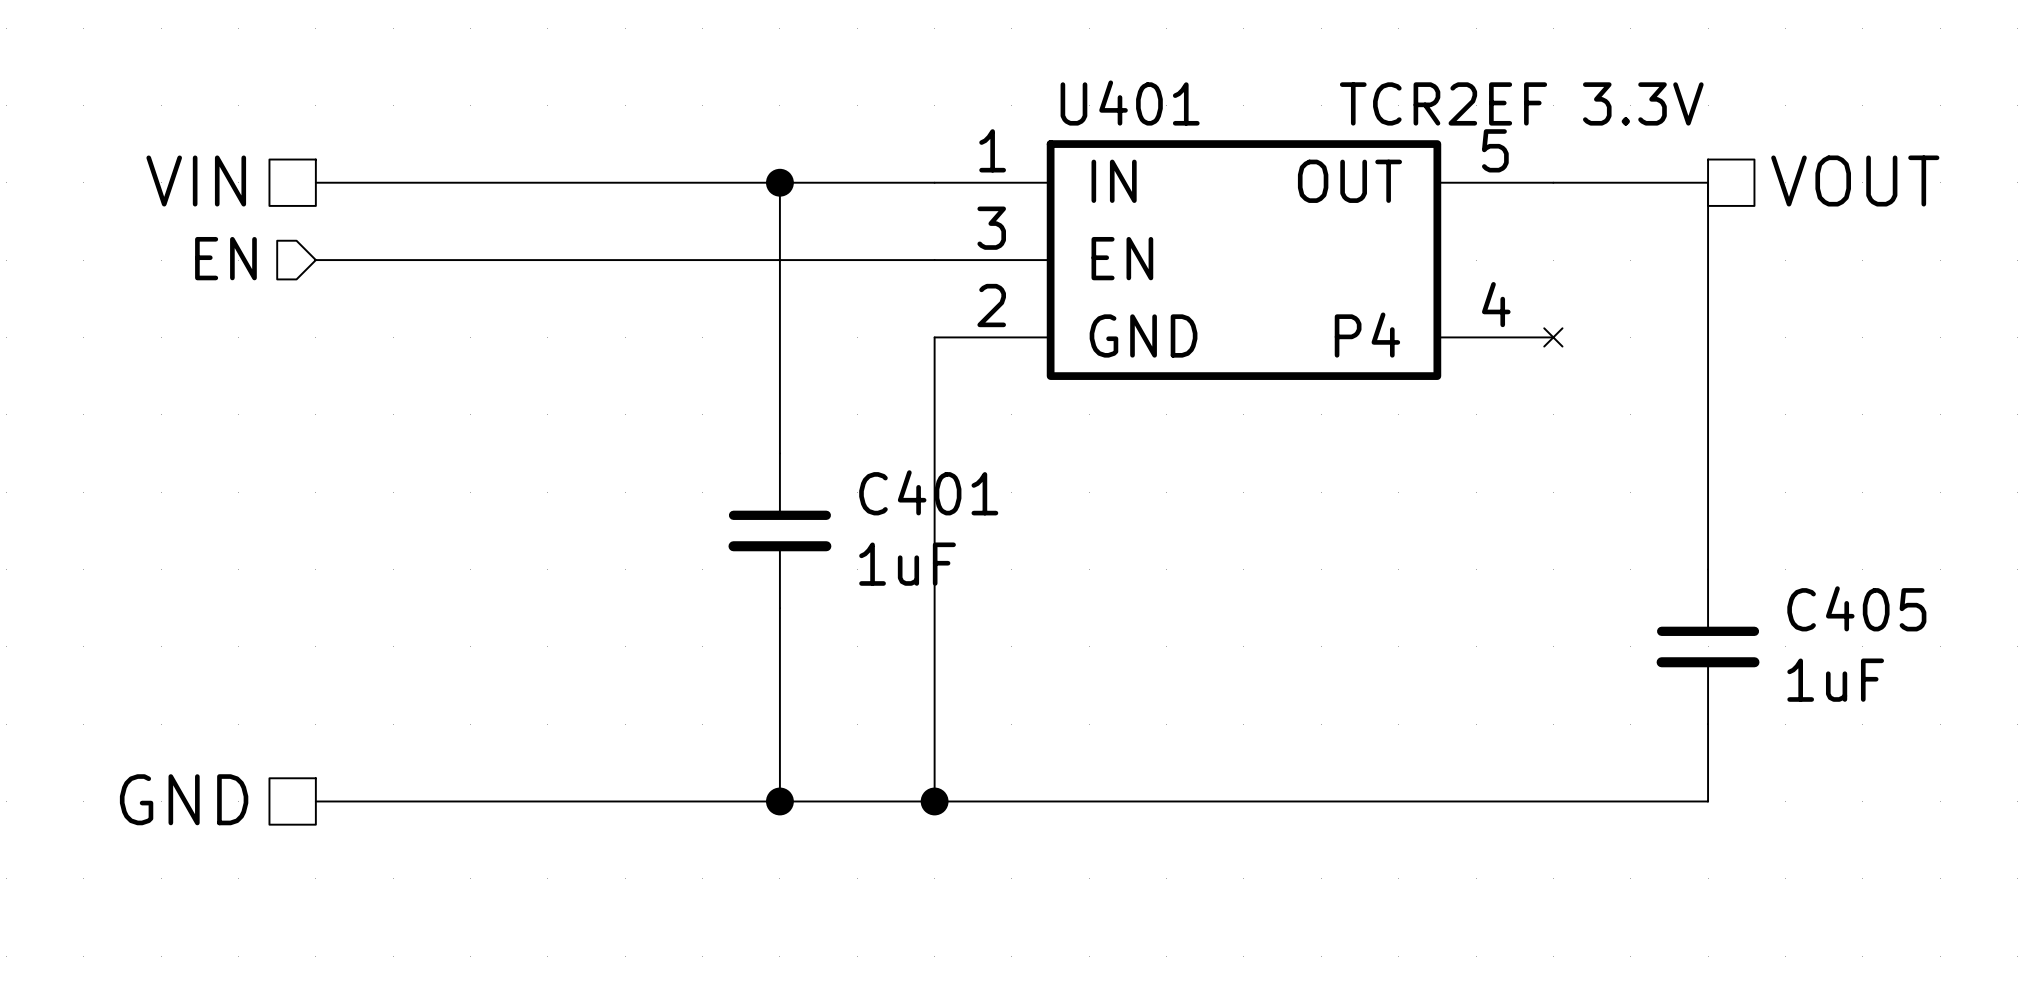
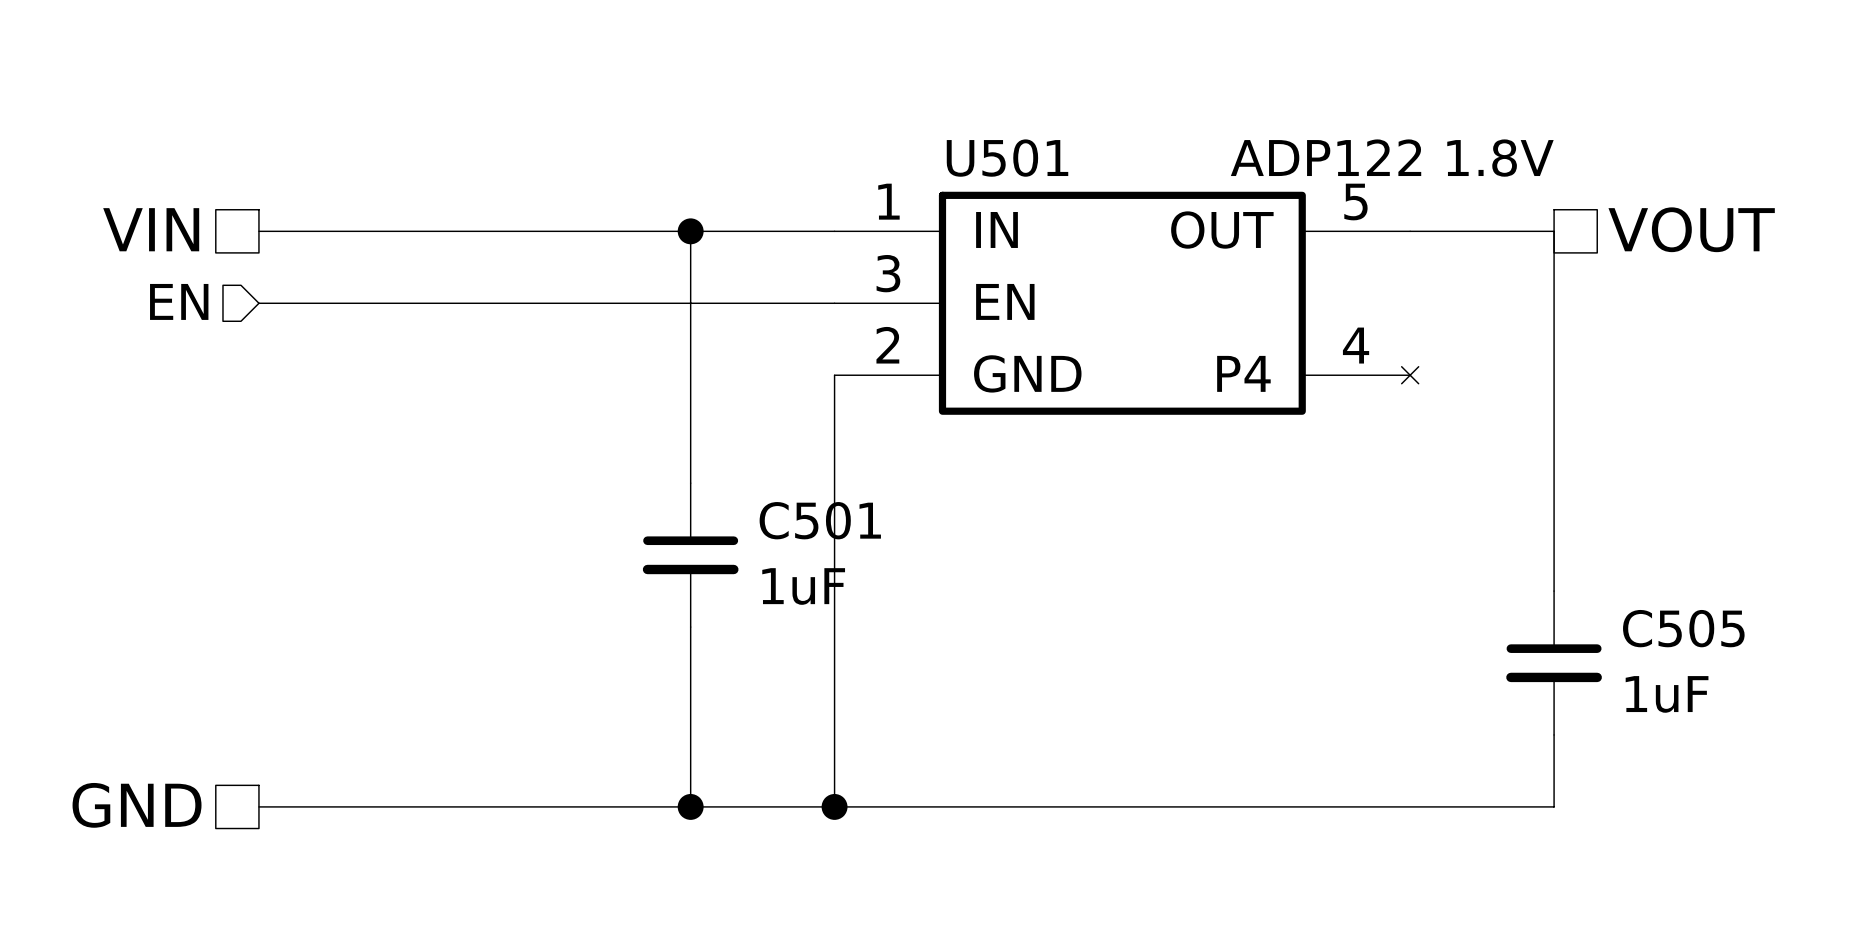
U401 name: U401 (1130, 103) -> U501 (1007, 158)
U401 value: TCR2EF 3.3V (1521, 103) -> ADP122 1.8V (1392, 158)
C401 name: C401 (928, 492) -> C501 (820, 520)
C405 name: C405 (1856, 608) -> C505 (1683, 628)

